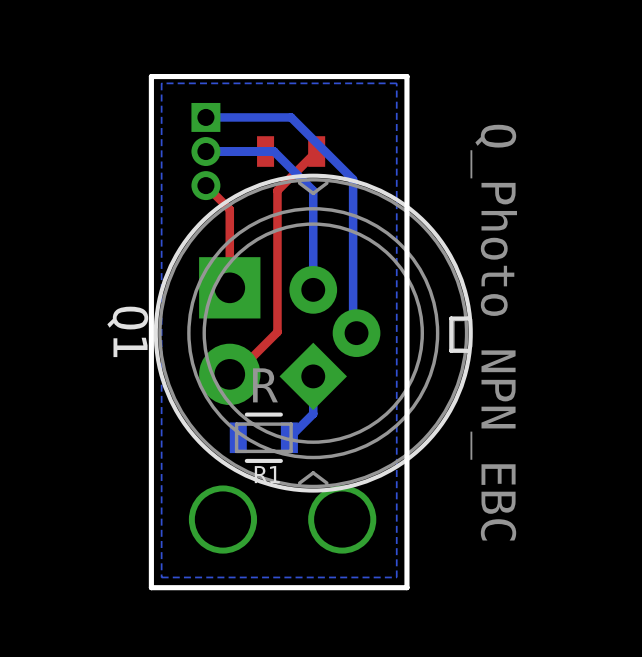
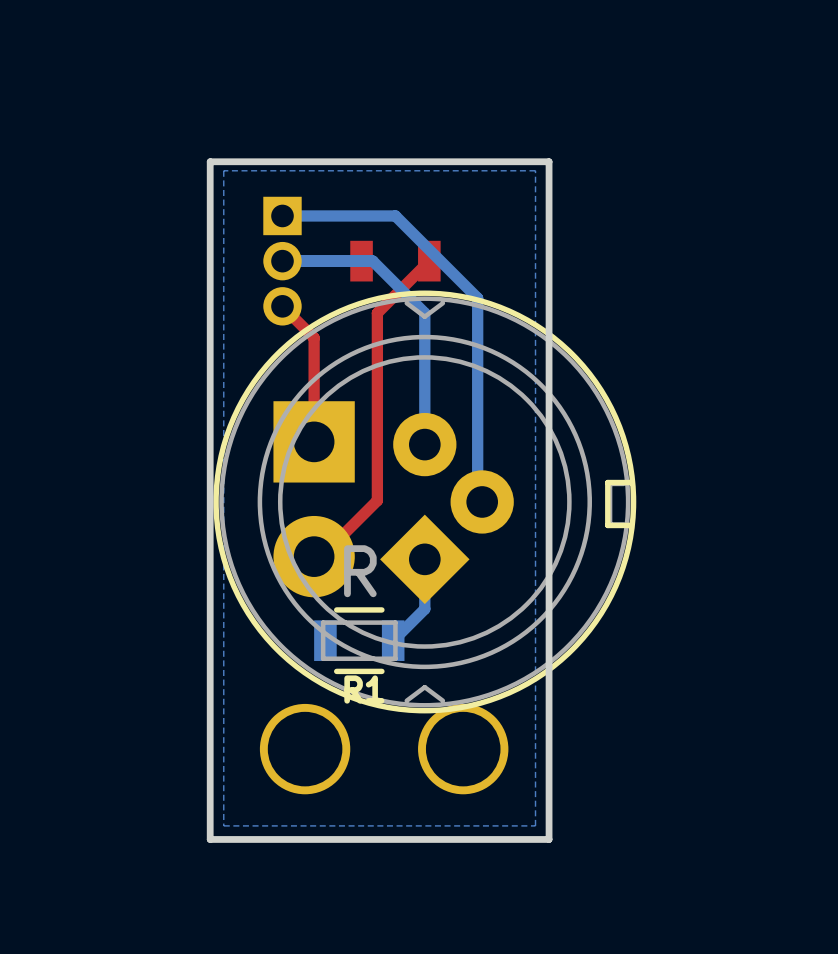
Q1 name: Q1 (127, 331) -> none
Q1 value: Q_Photo_NPN_EBC (493, 332) -> none

